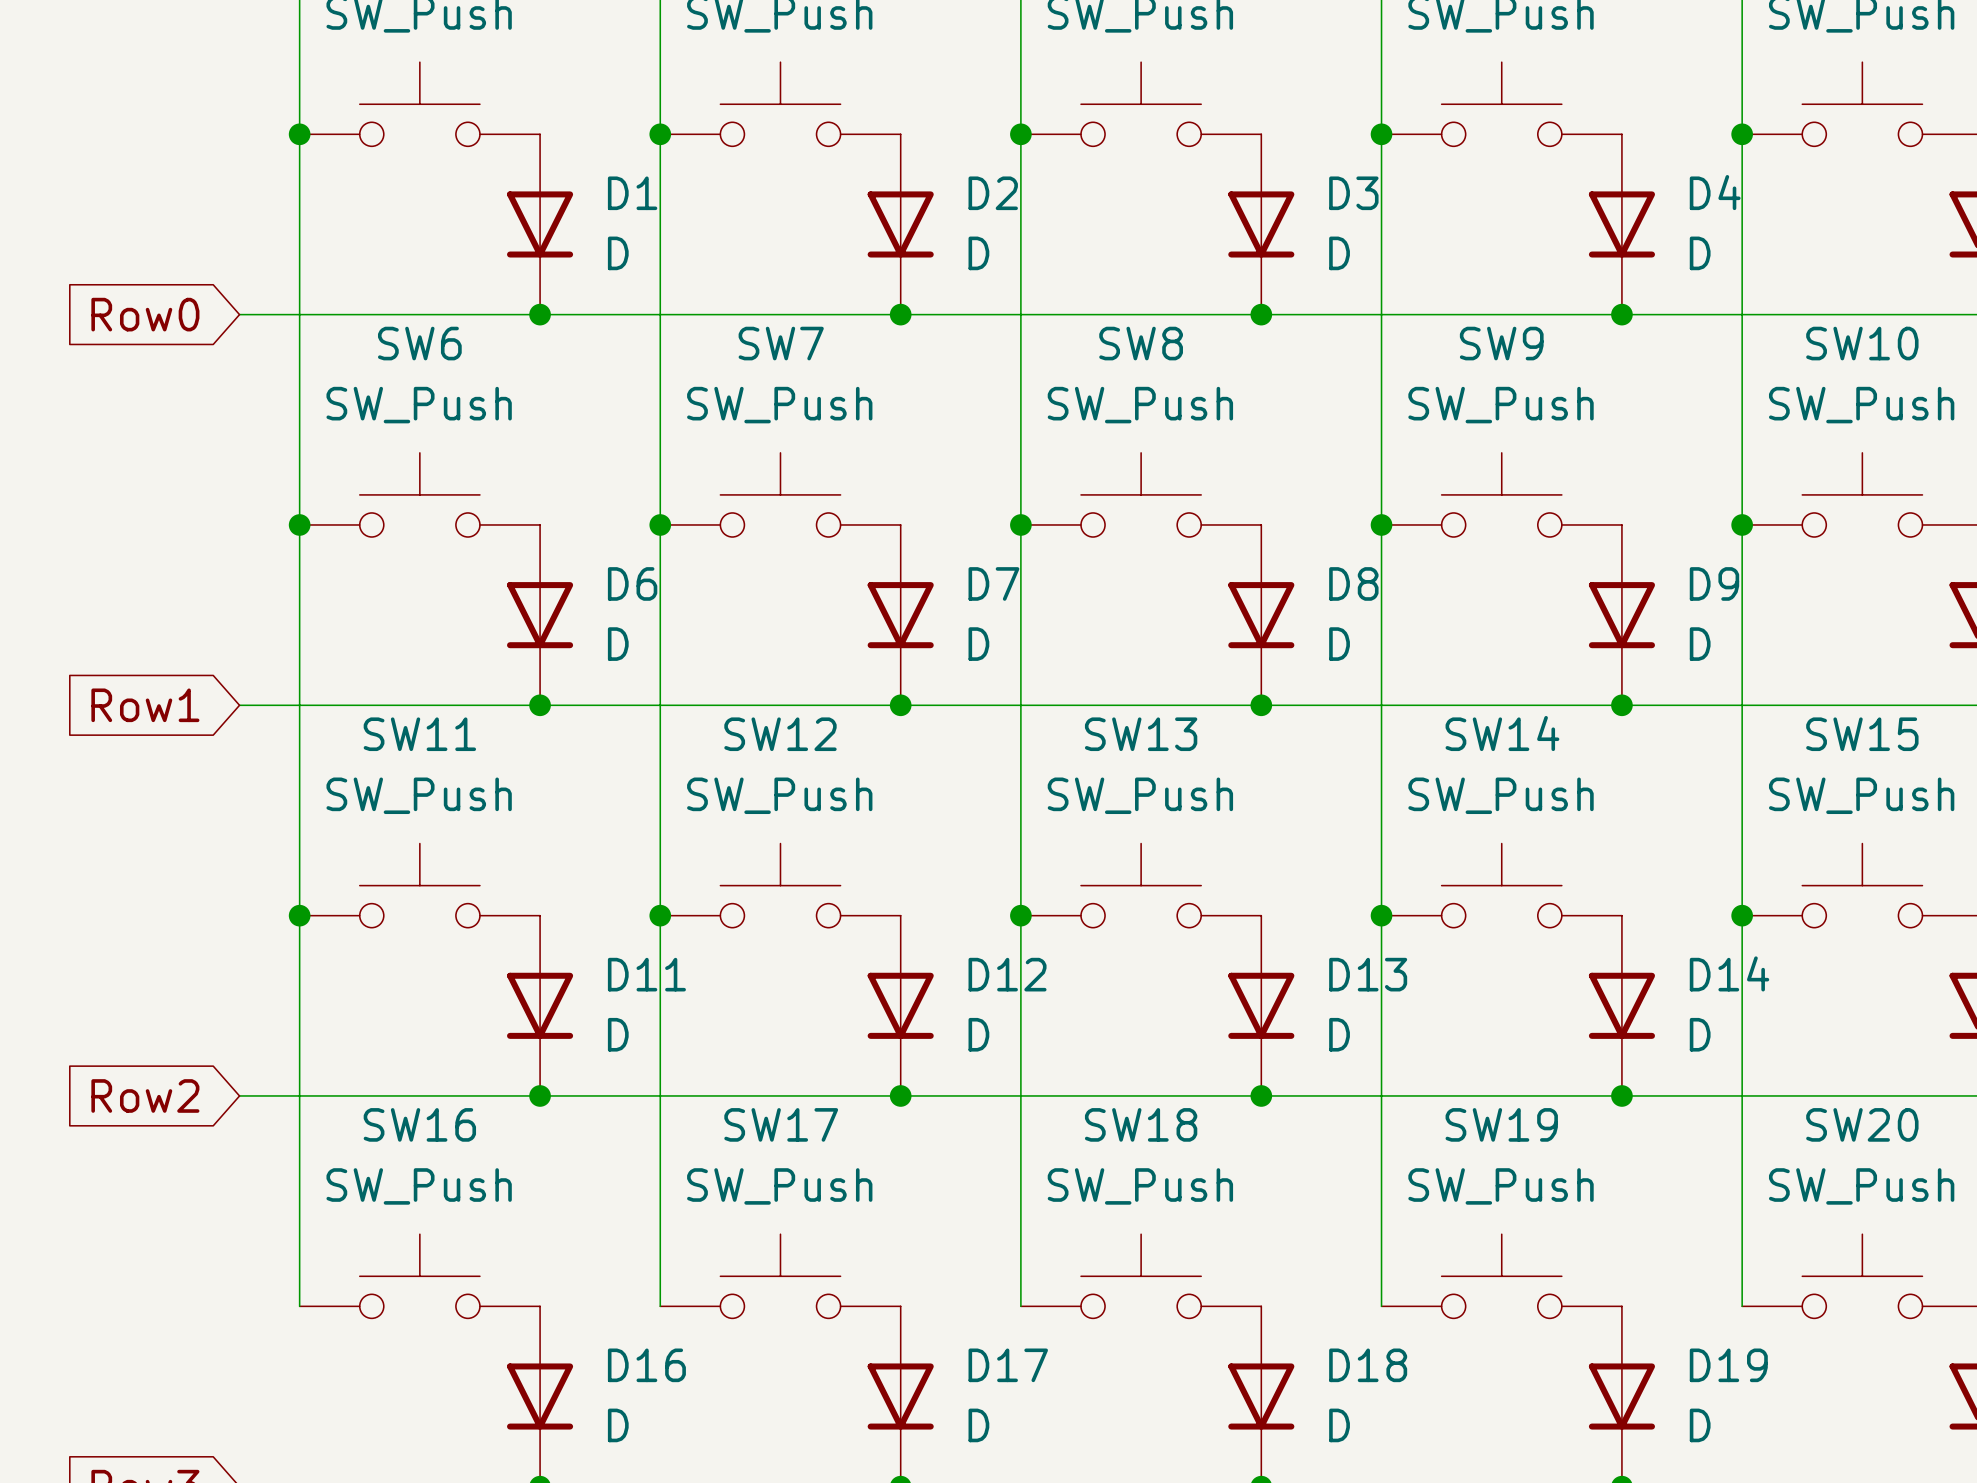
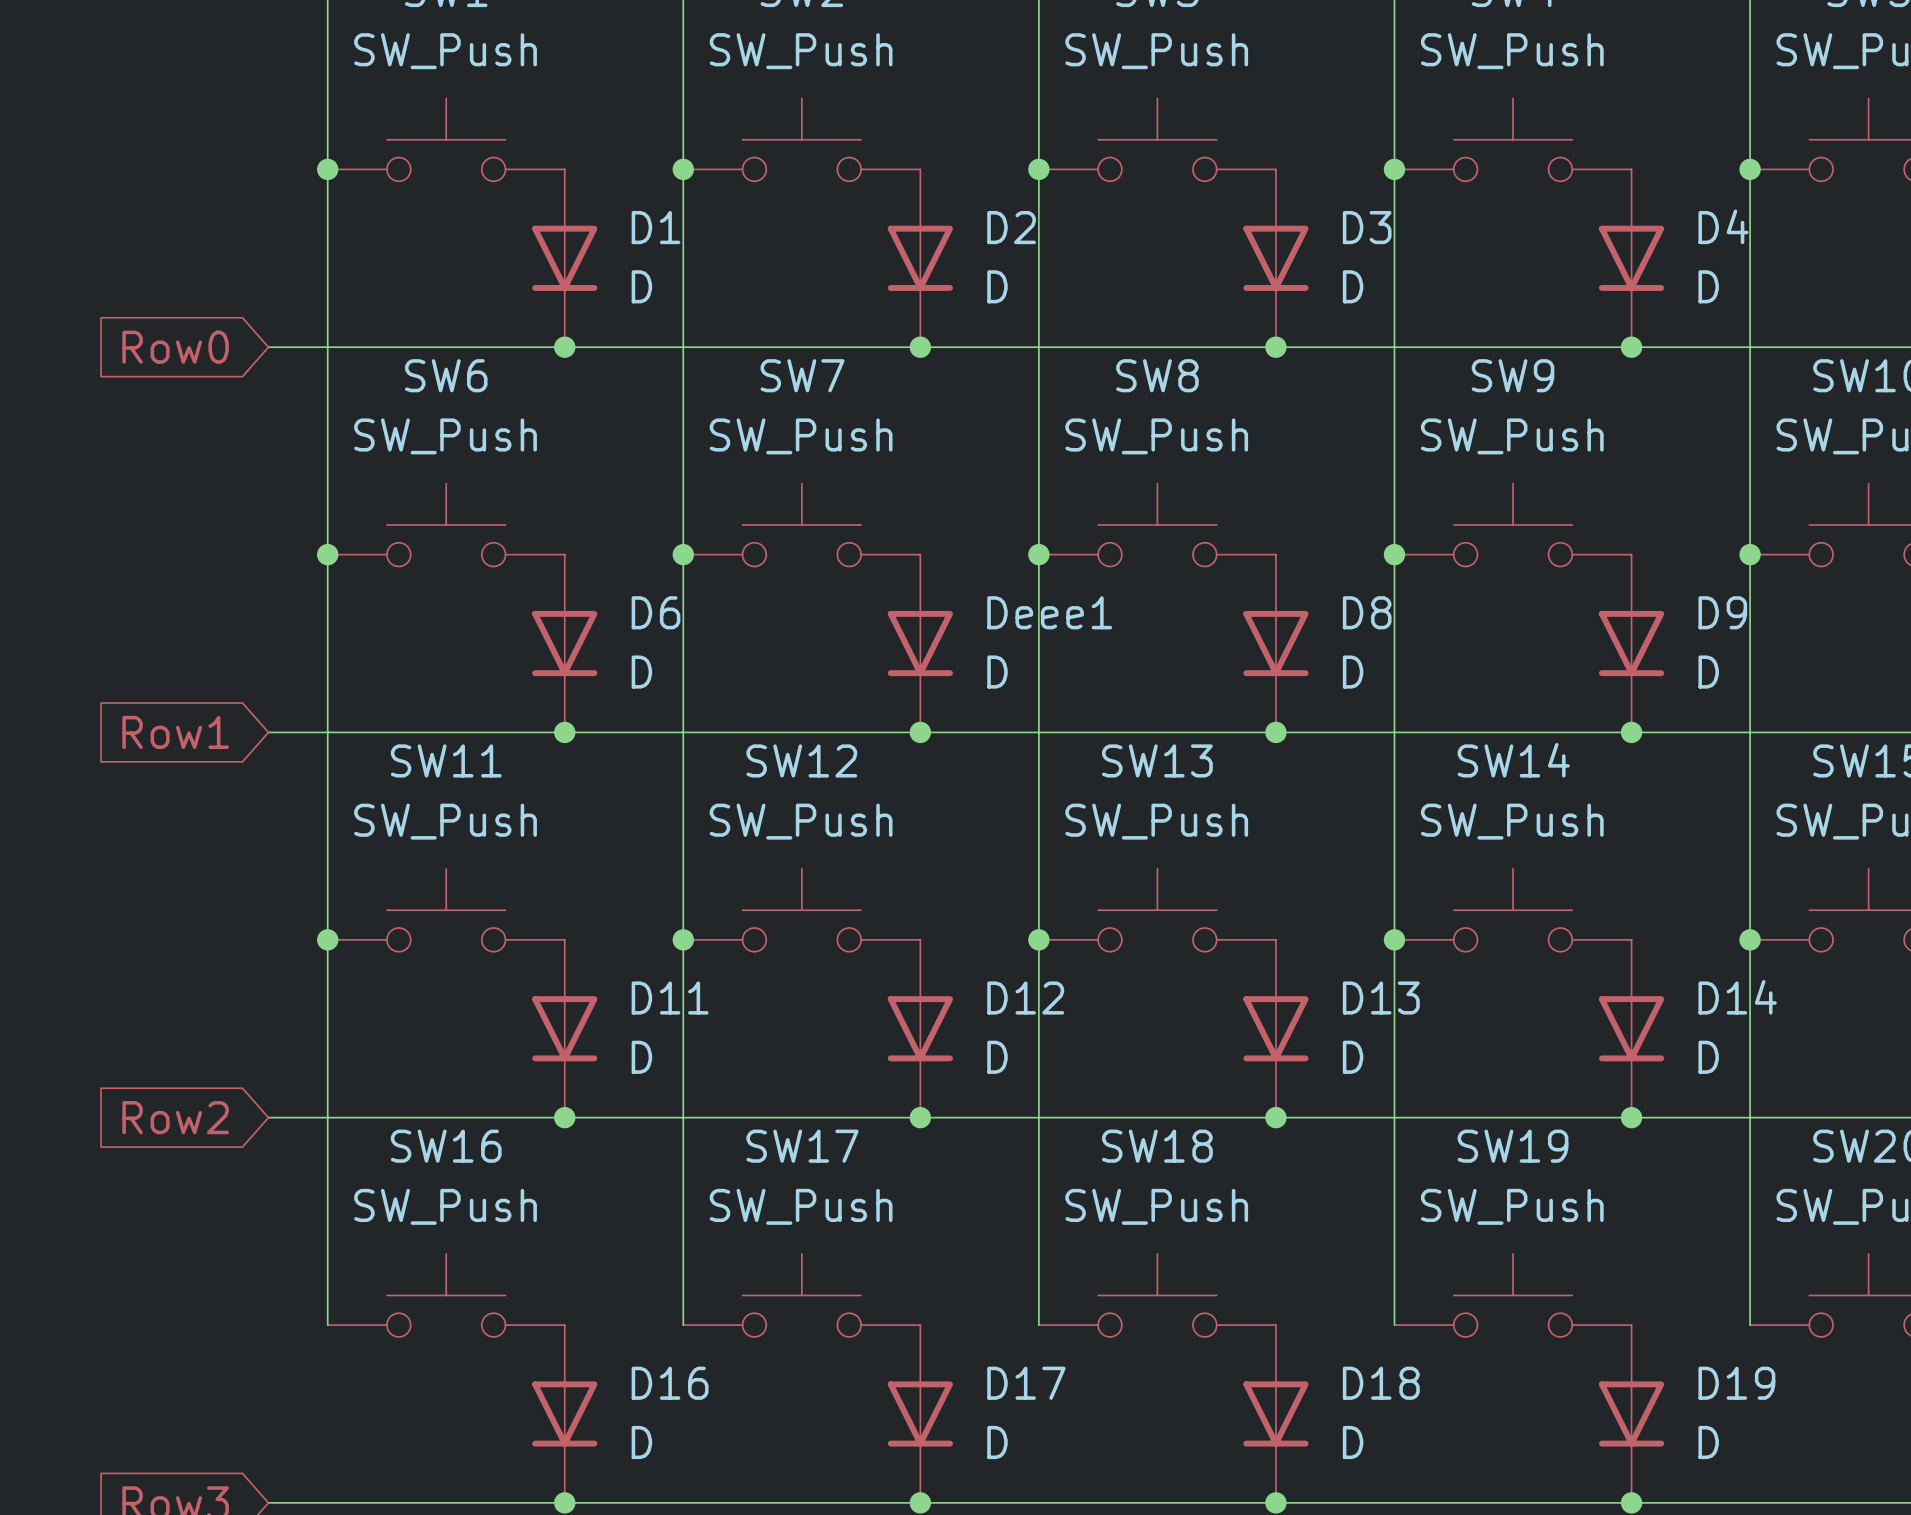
D7 name: D7 (993, 583) -> Deee1 (1049, 612)

